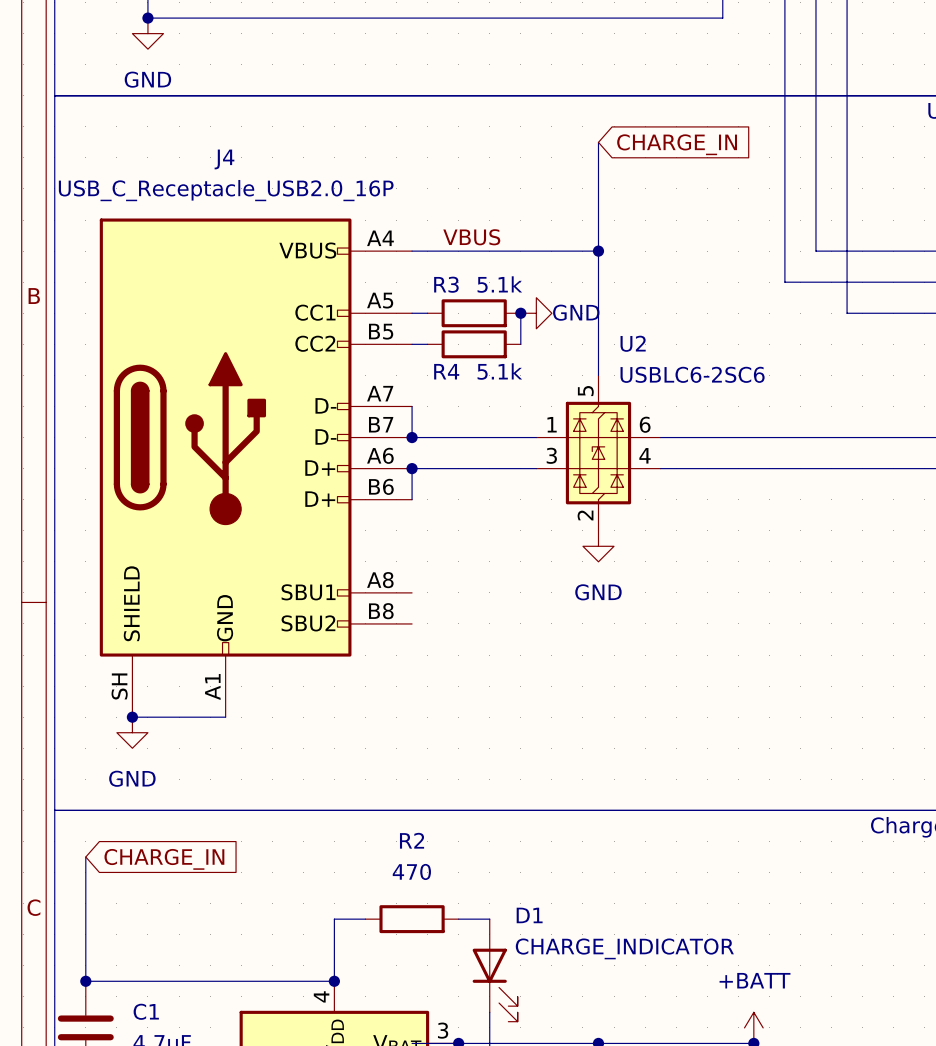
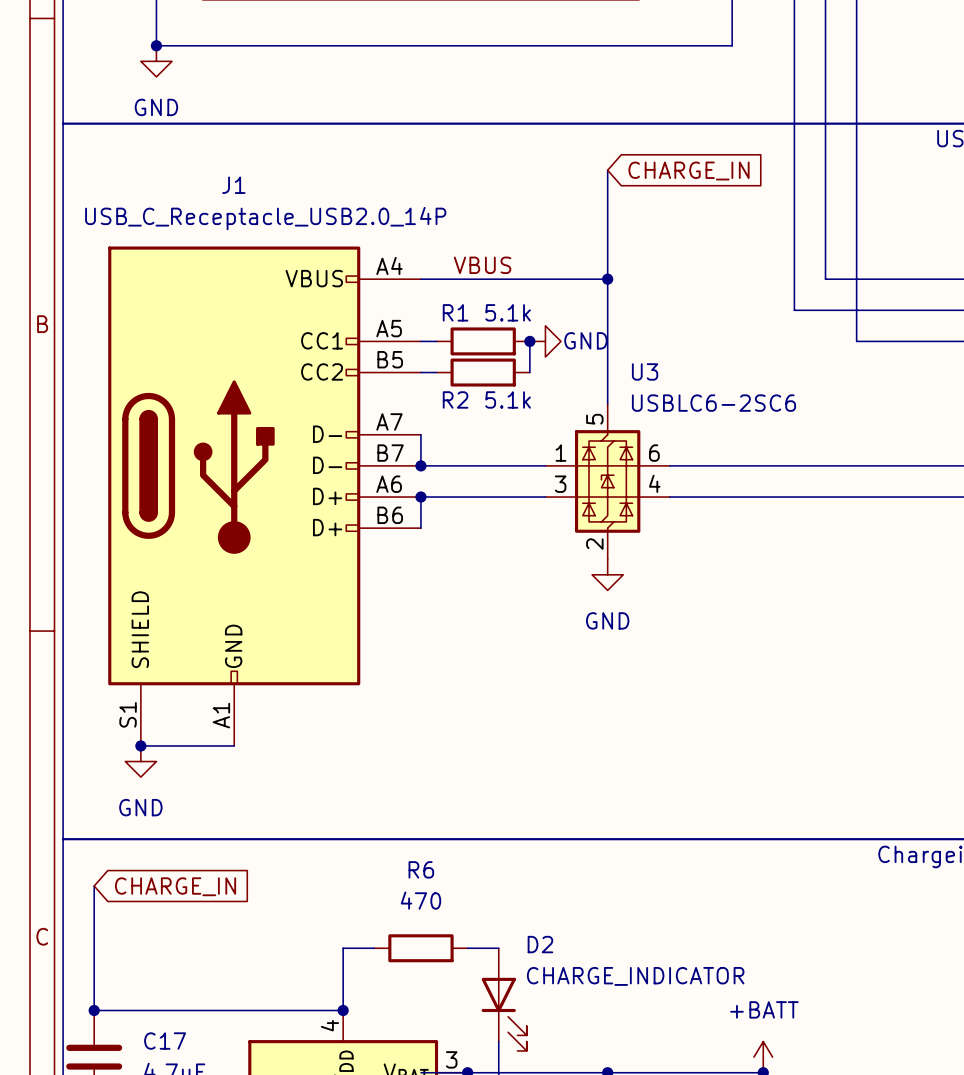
R3 name: R3 (446, 284) -> R1 (455, 312)
U2 name: U2 (633, 343) -> U3 (645, 371)
R4 name: R4 (446, 371) -> R2 (455, 399)
J4: USB_C_Receptacle_USB2.0_16P (255, 467) -> none
J1: none -> USB_C_Receptacle_USB2.0_14P (264, 496)
R2 name: R2 (412, 840) -> R6 (421, 869)
D1 name: D1 (529, 915) -> D2 (540, 944)
C1 name: C1 (146, 1011) -> C17 (165, 1041)

